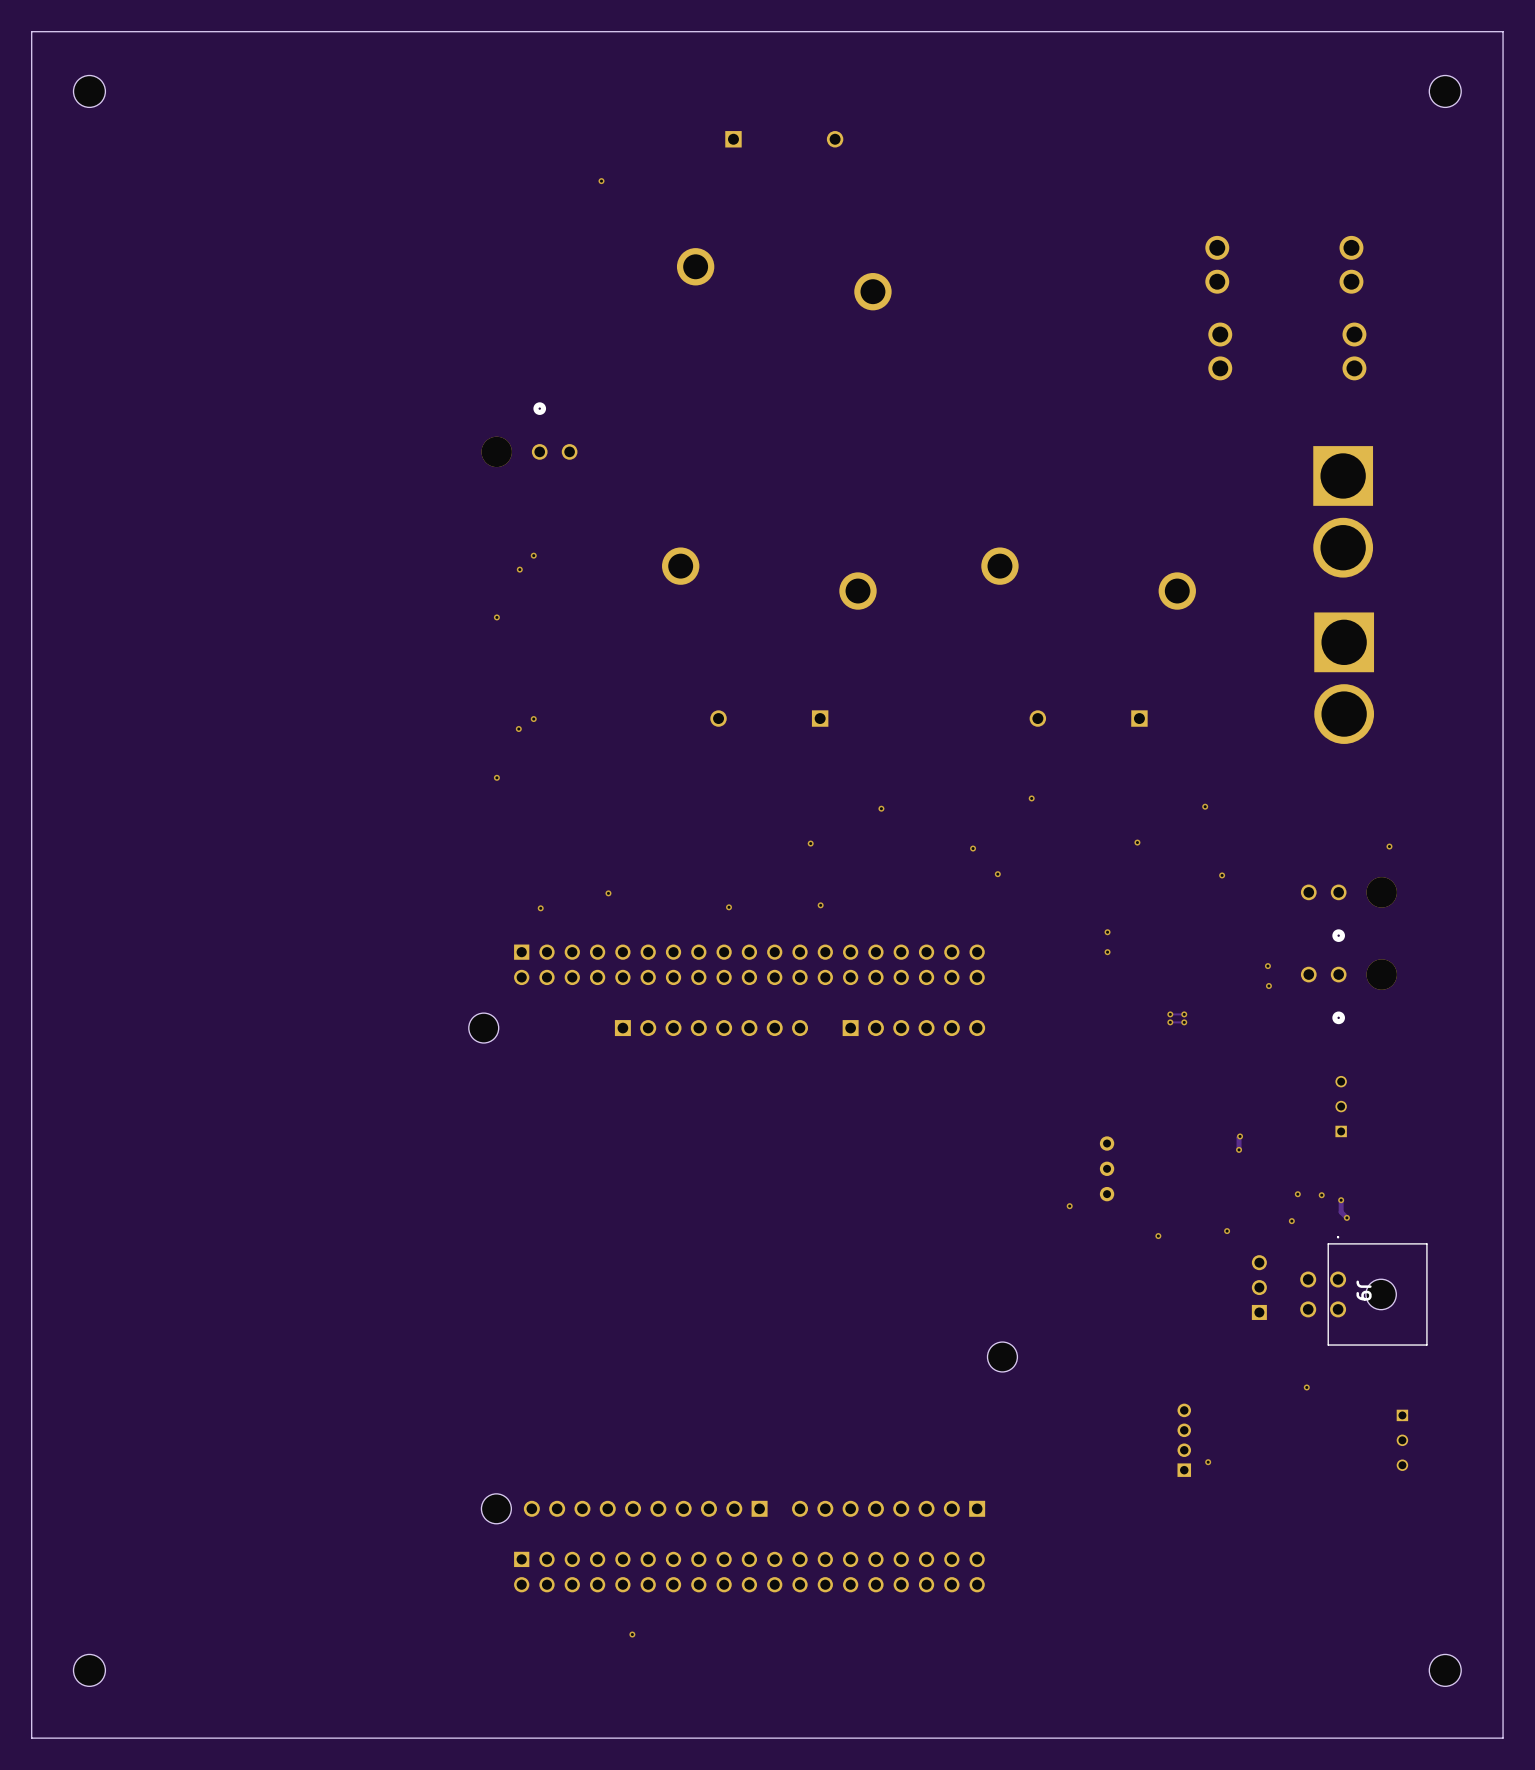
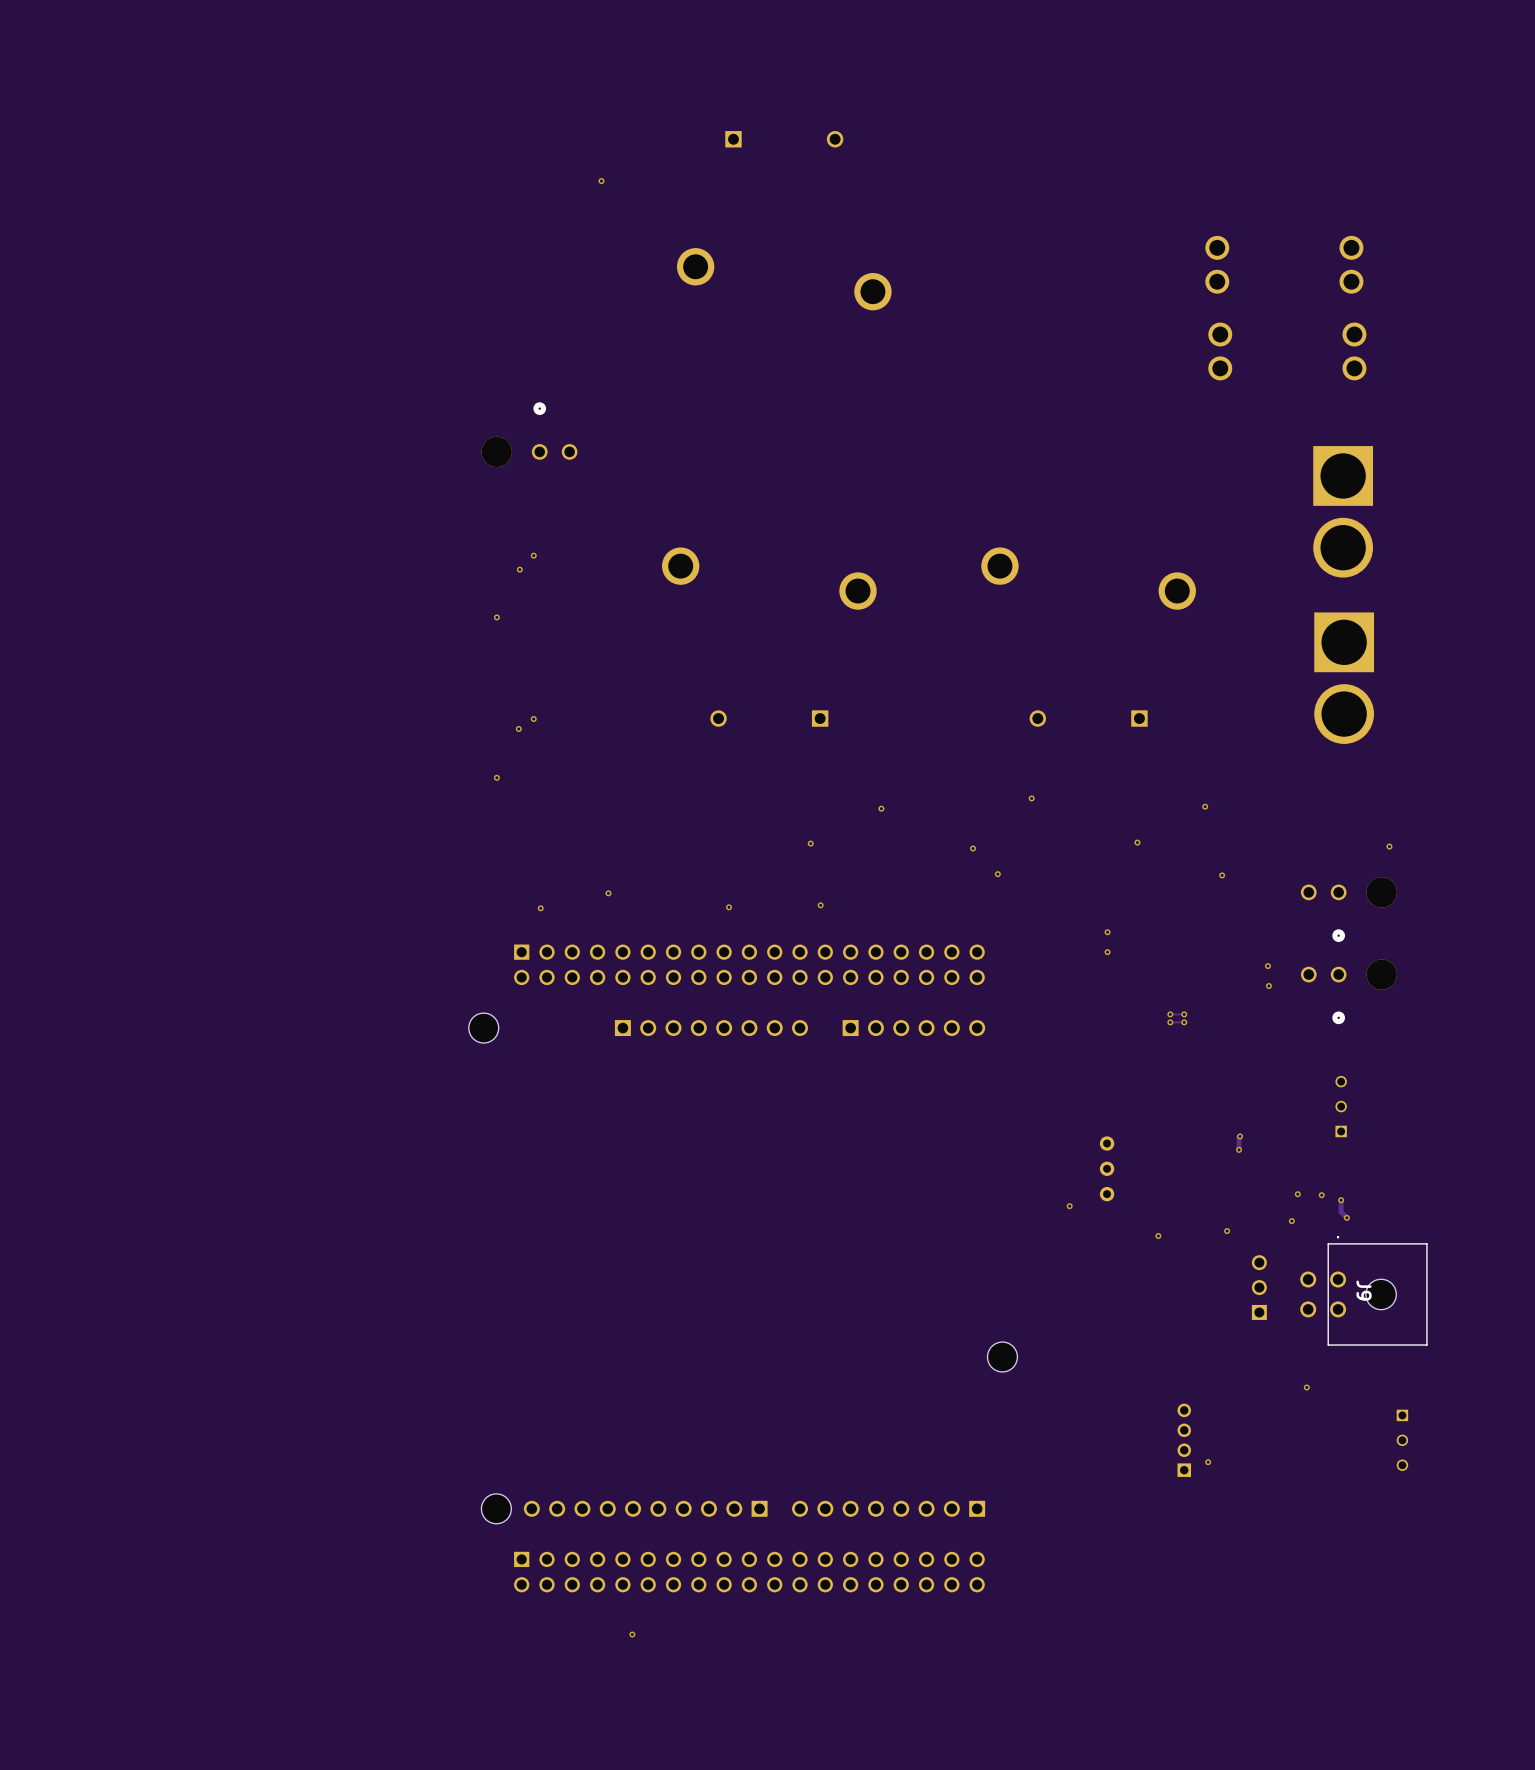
board edge: (1503, 31) (31, 31) (31, 1738) (1503, 1738) (1503, 31) -> none
part: (89, 91) -> none
part: (1445, 91) -> none
part: (89, 1670) -> none
part: (1445, 1670) -> none

